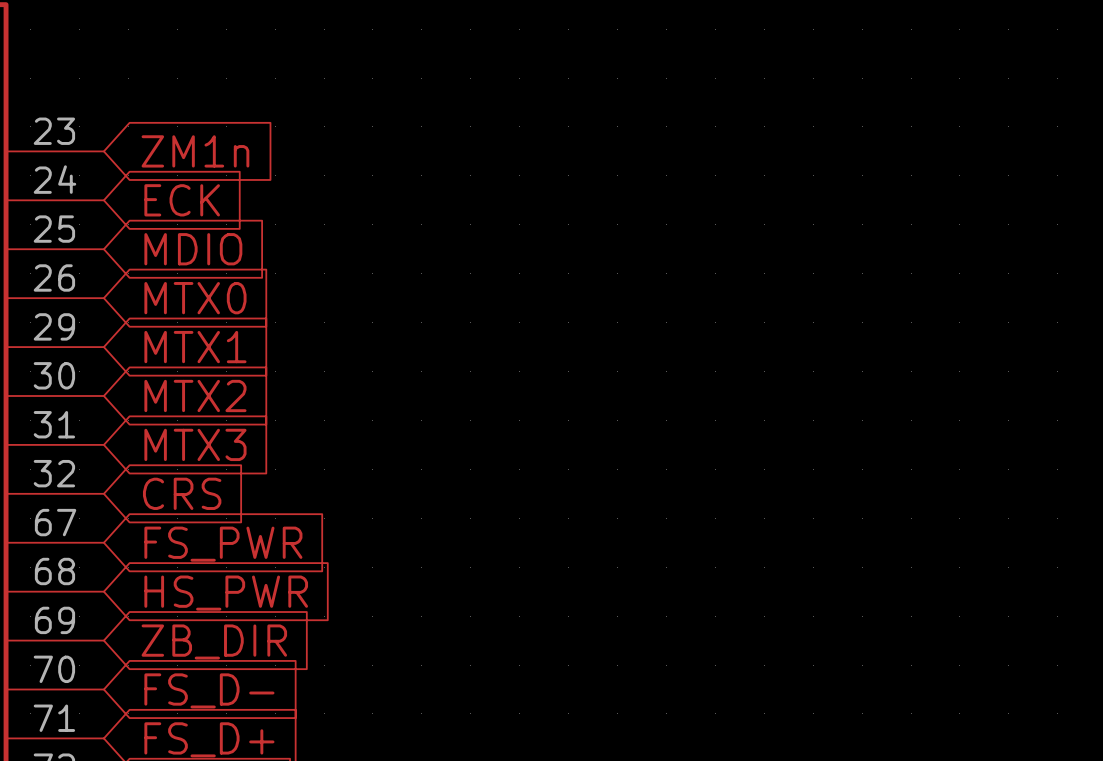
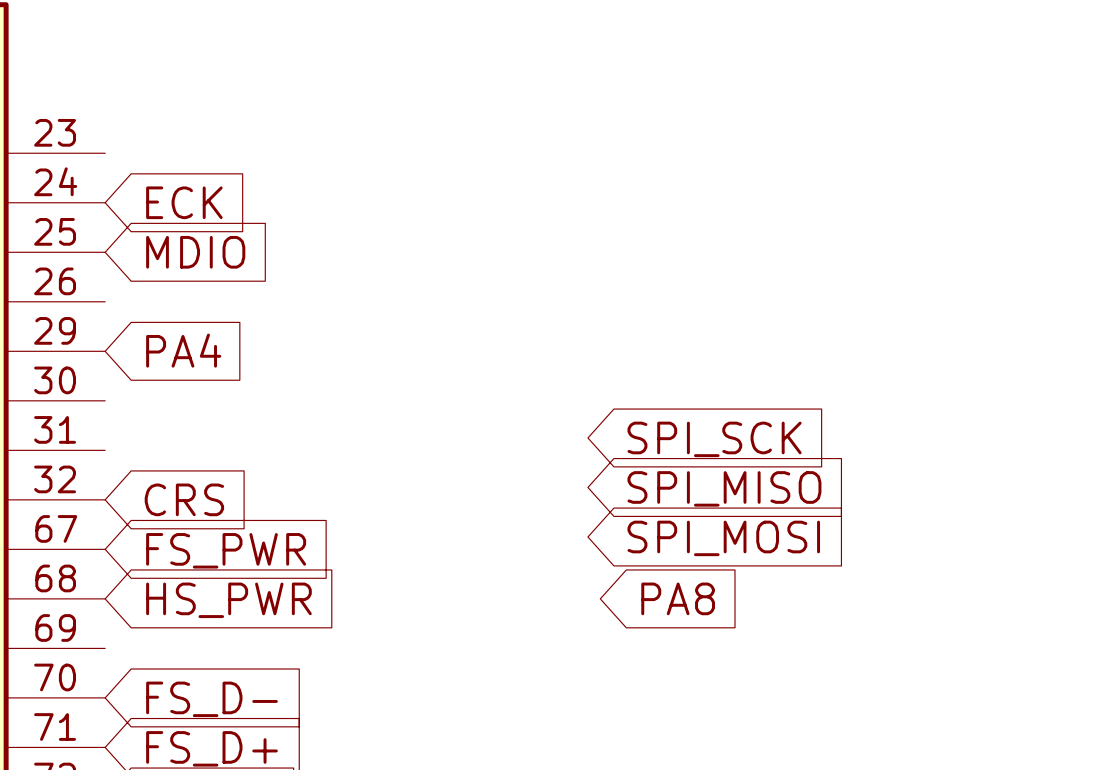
global label: ZM1n (195, 151) -> none
global label: MTX0 (195, 298) -> none
global label: MTX1 (195, 347) -> PA4 (183, 350)
global label: MTX2 (195, 395) -> none
global label: none -> SPI_SCK (714, 439)
global label: MTX3 (195, 444) -> none
global label: none -> SPI_MISO (724, 488)
global label: none -> SPI_MOSI (723, 538)
global label: none -> PA8 (678, 598)
global label: ZB_DIR (214, 641) -> none

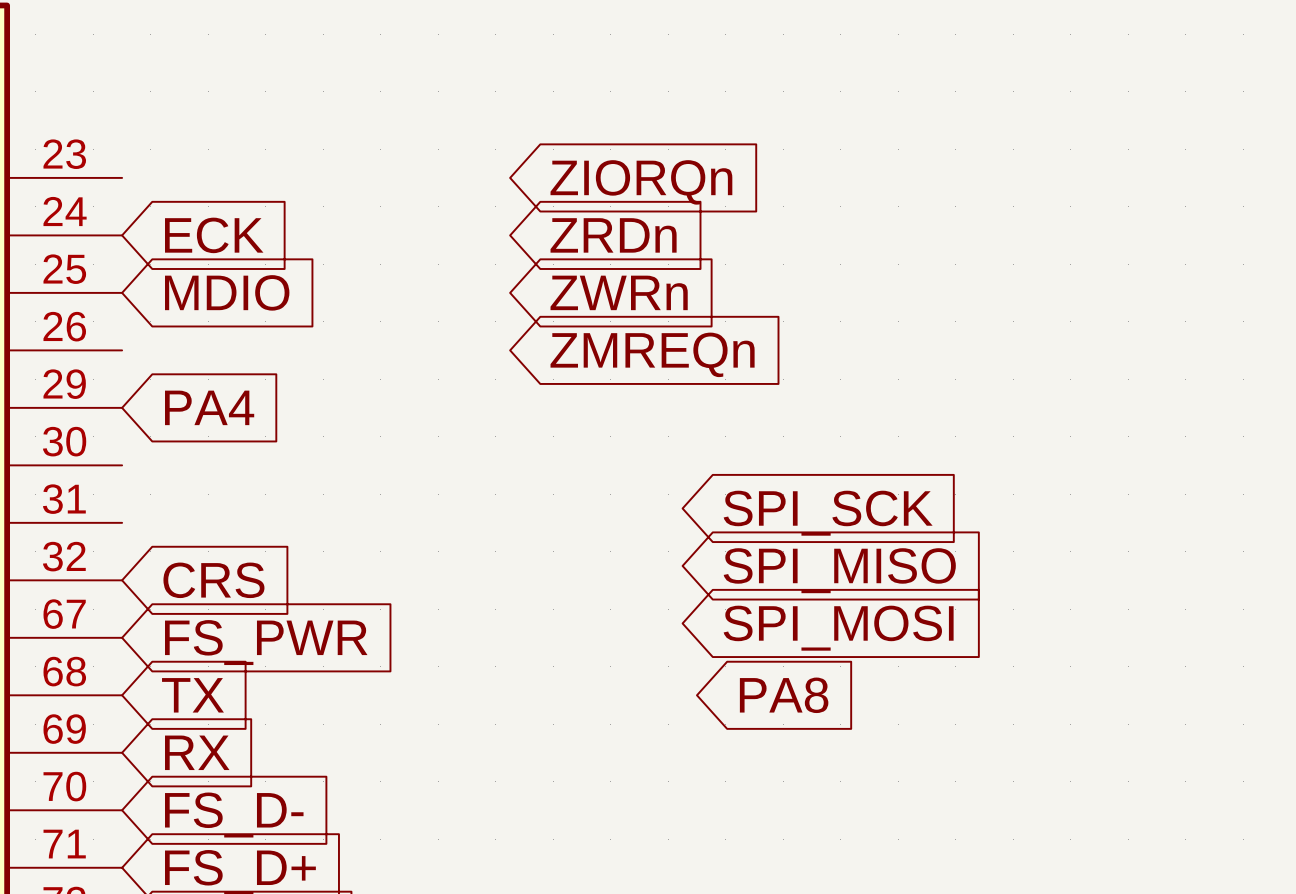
global label: none -> ZIORQn (641, 182)
global label: none -> ZRDn (613, 235)
global label: none -> ZWRn (619, 292)
global label: none -> ZMREQn (652, 354)
global label: HS_PWR (228, 600) -> TX (192, 695)
global label: none -> RX (197, 752)

